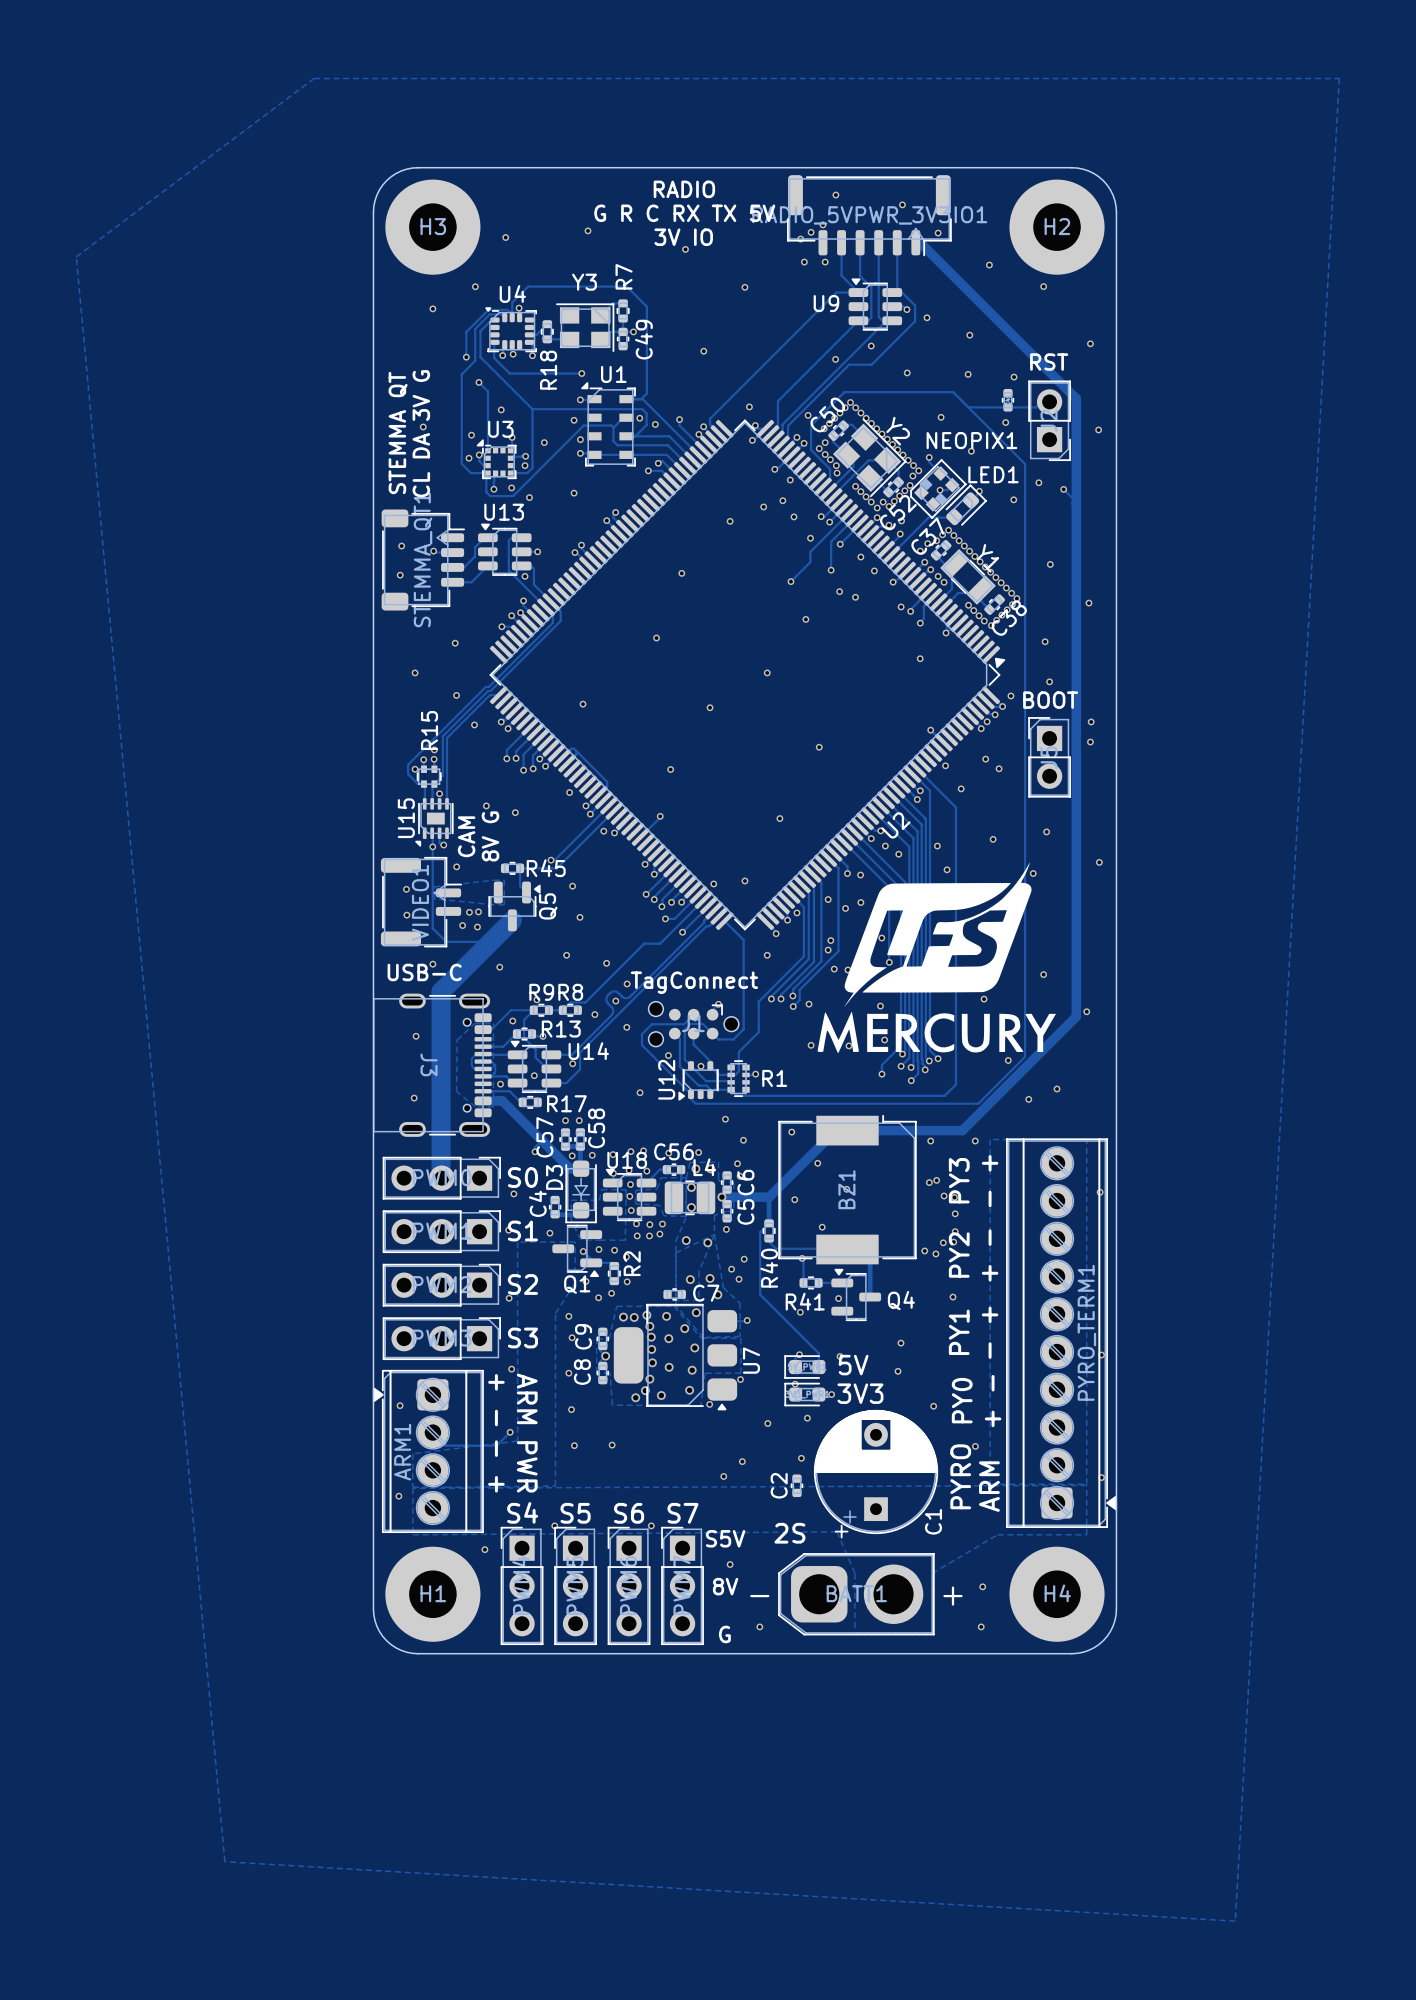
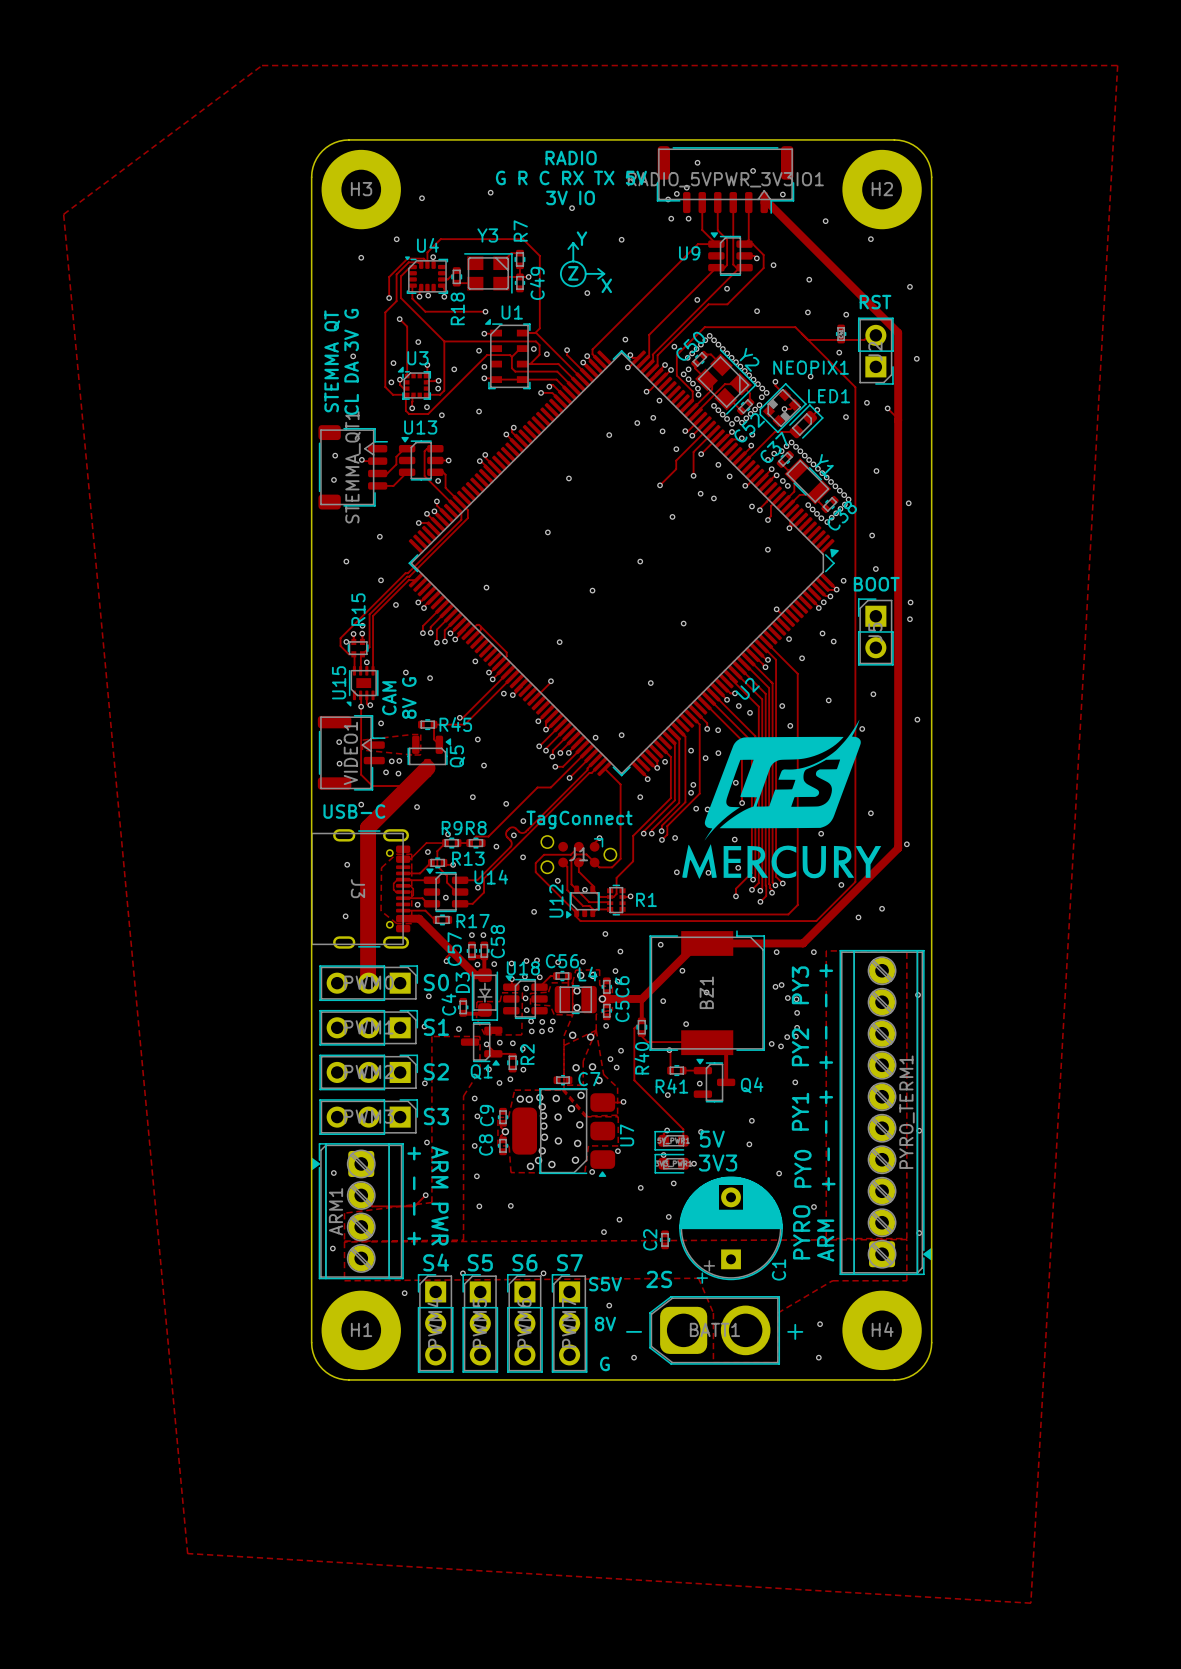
drawing: none -> [559, 241, 606, 288]

